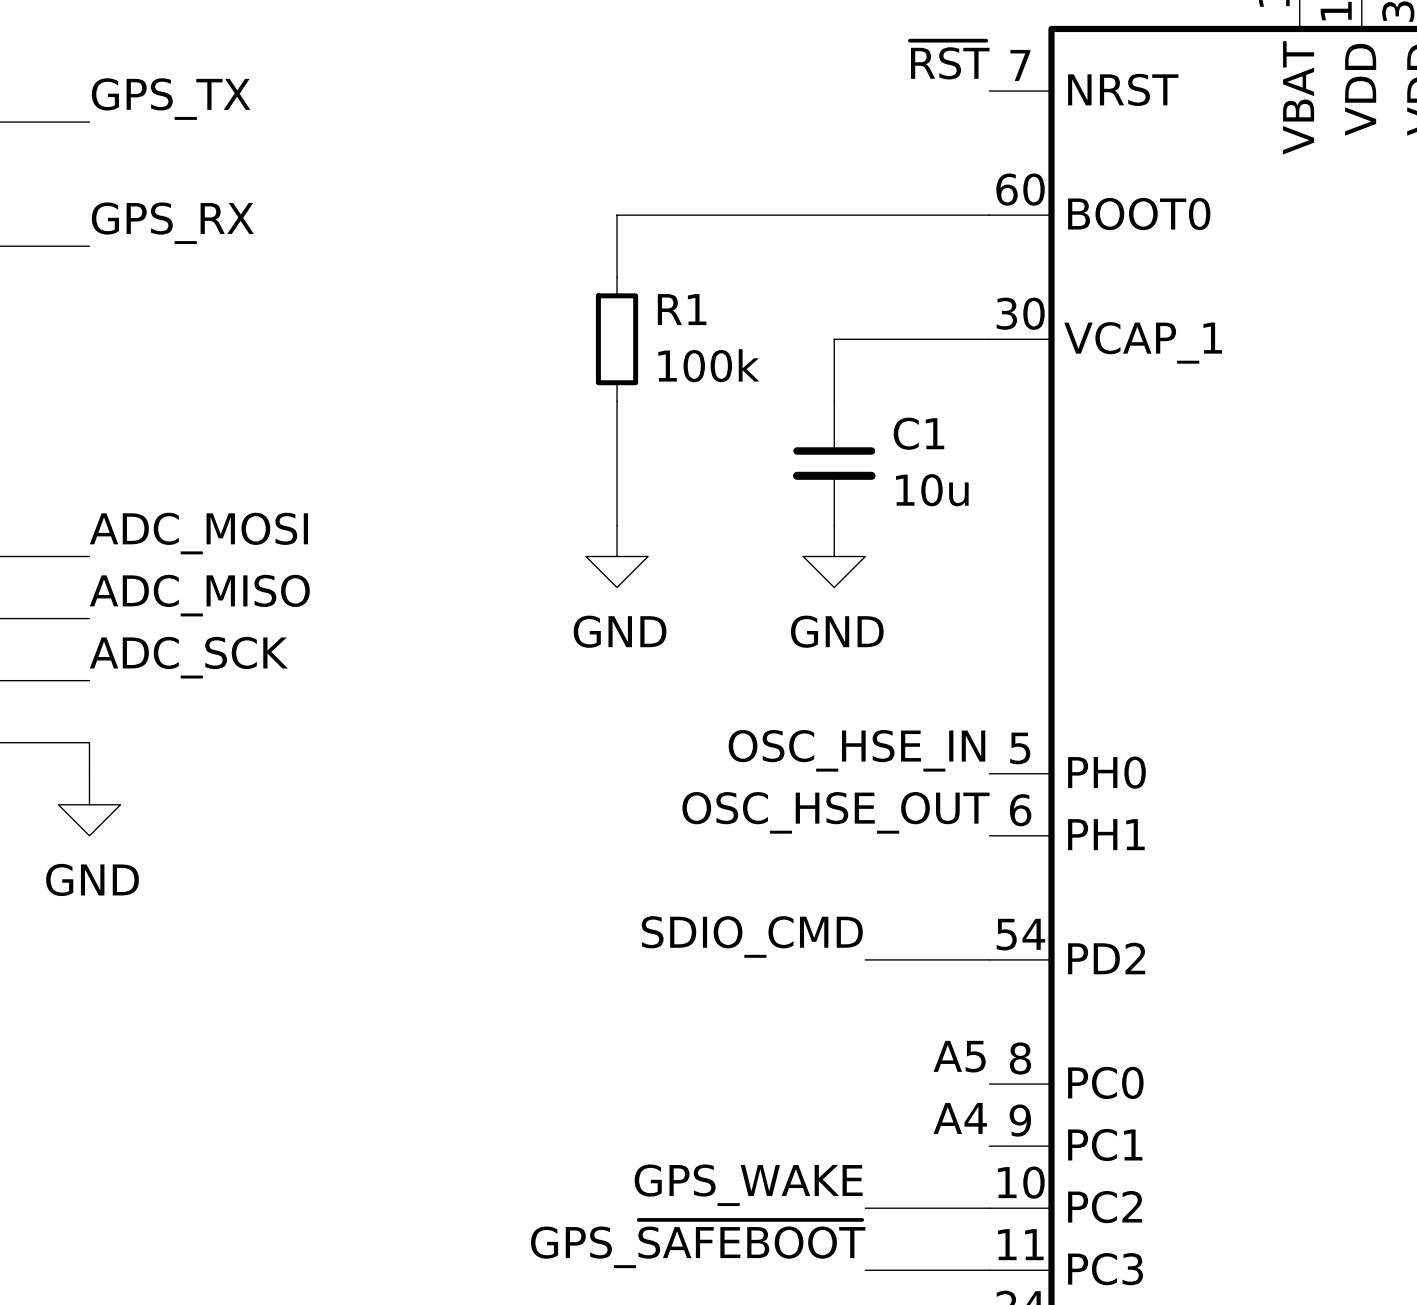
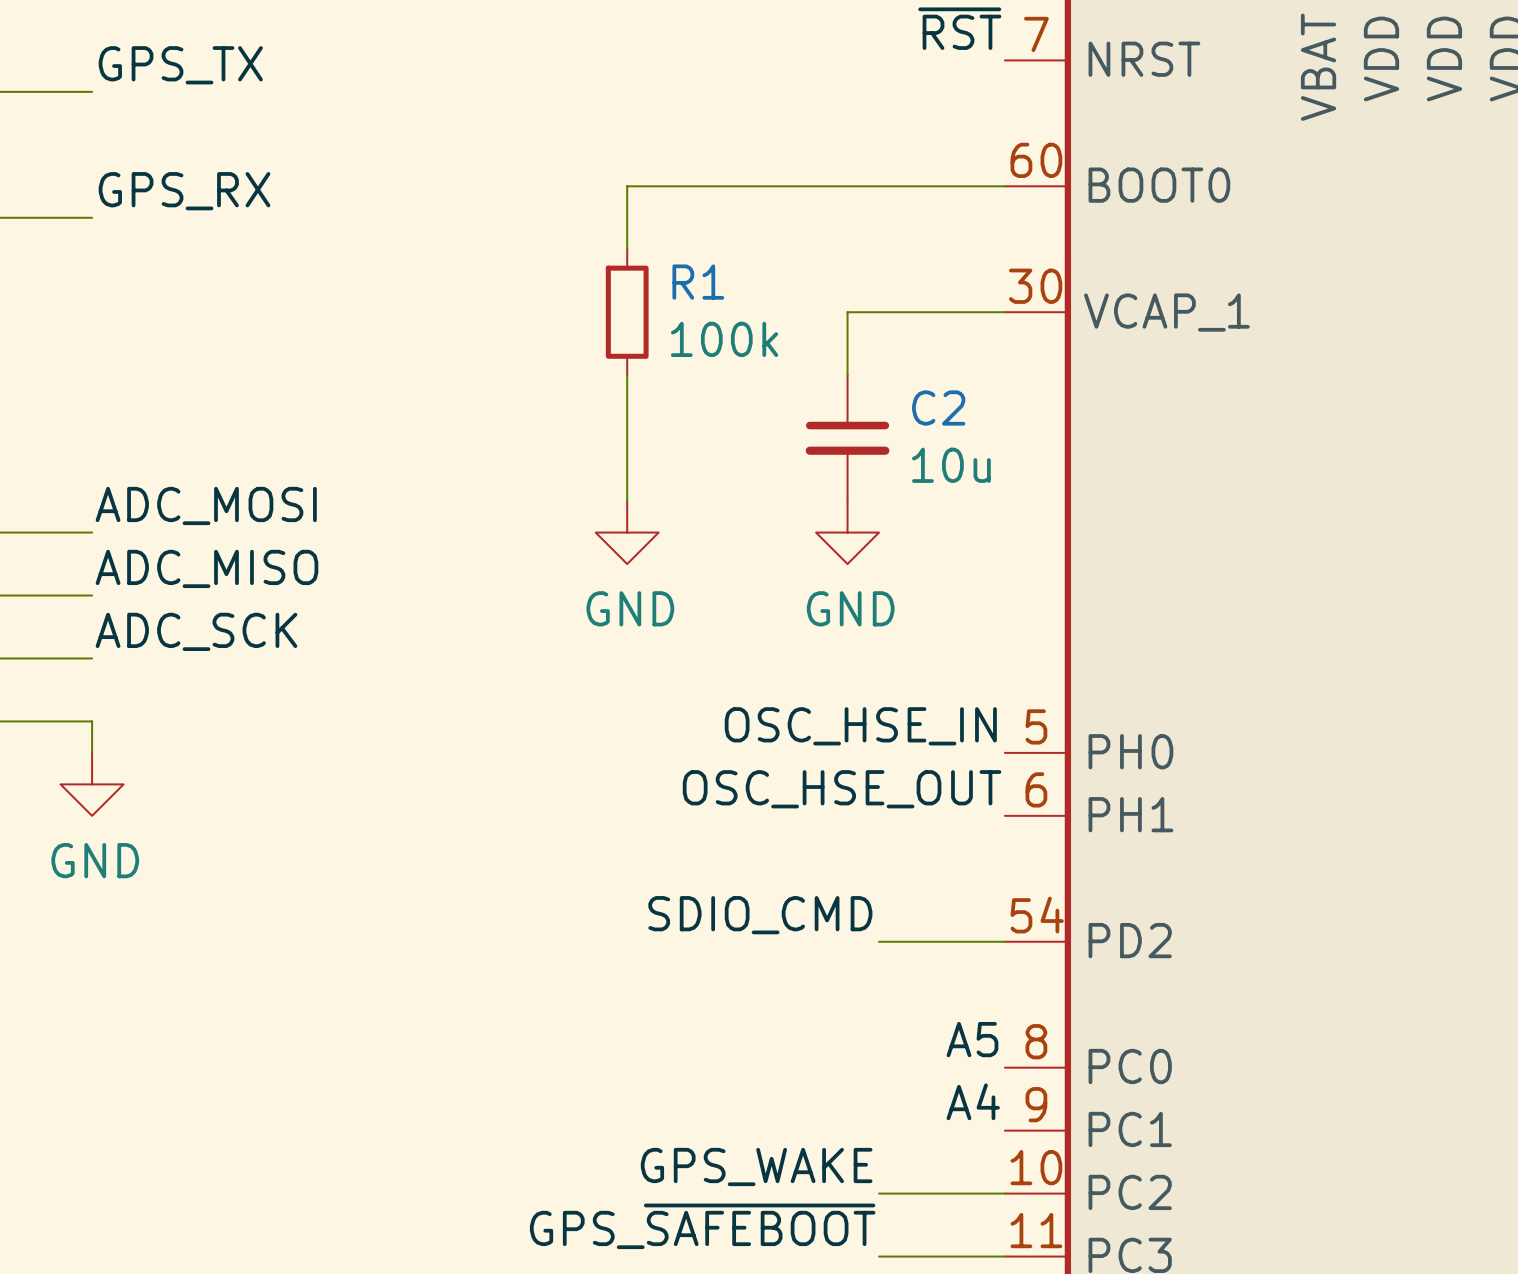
C1 name: C1 (918, 433) -> C2 (938, 407)

